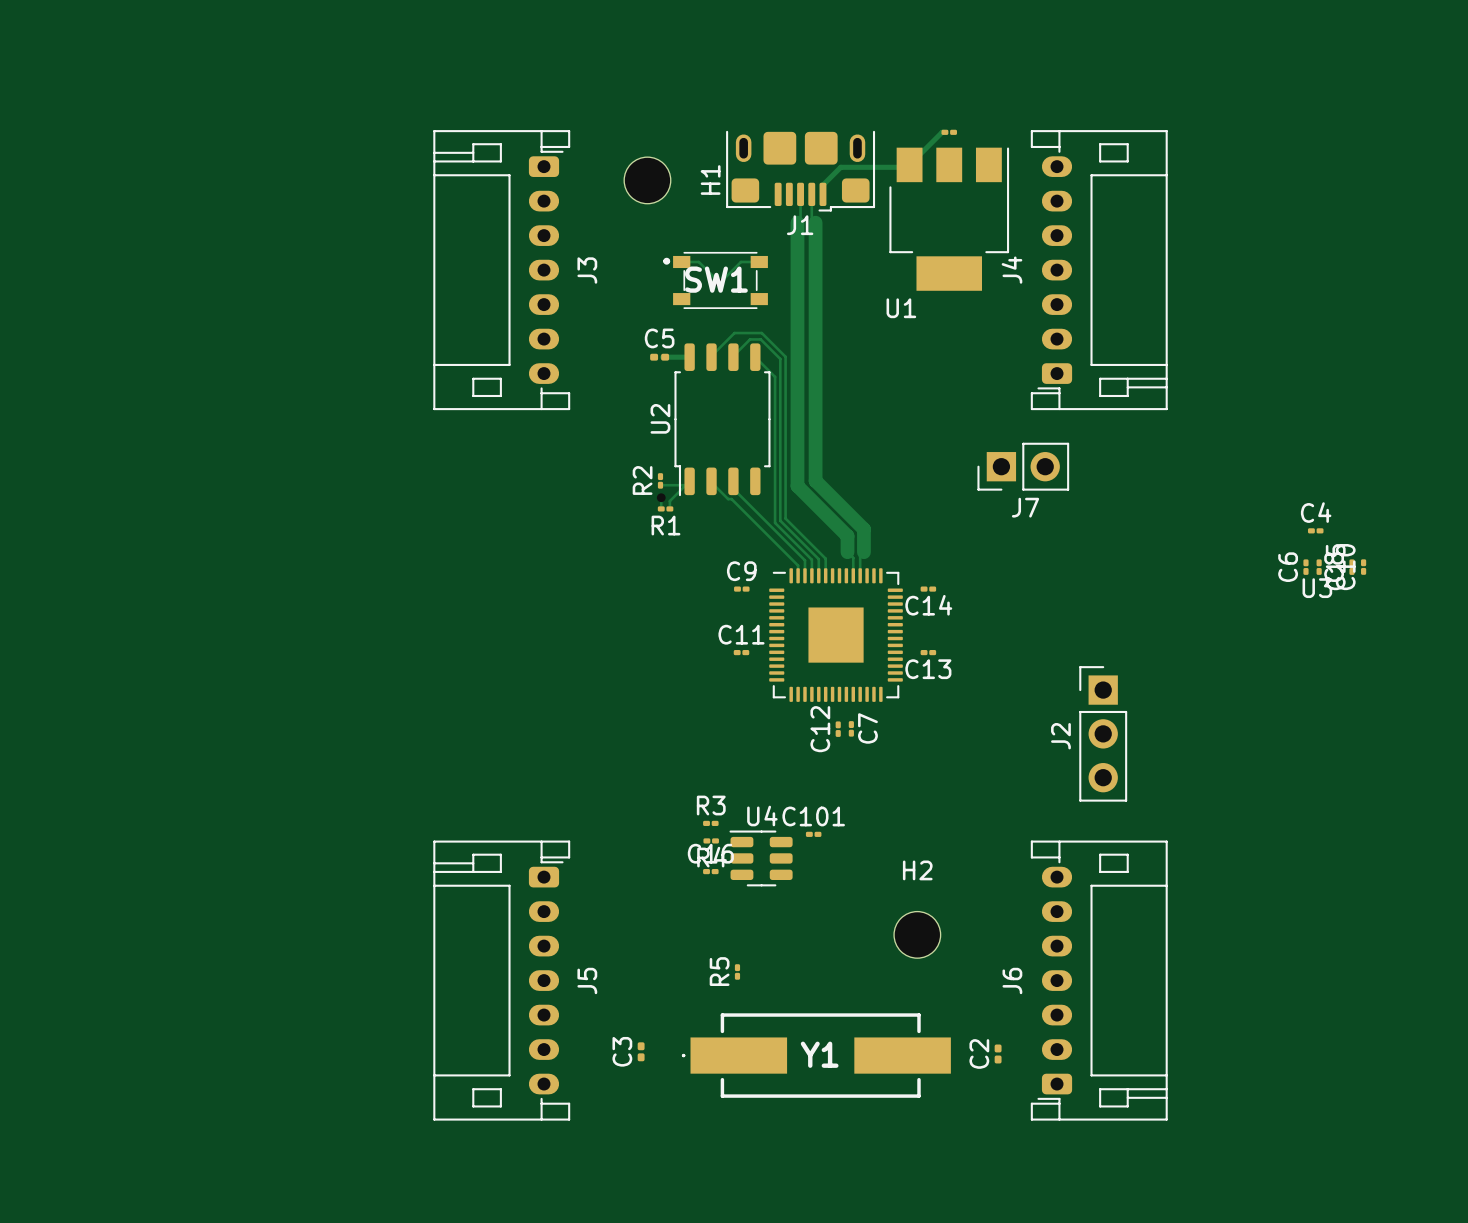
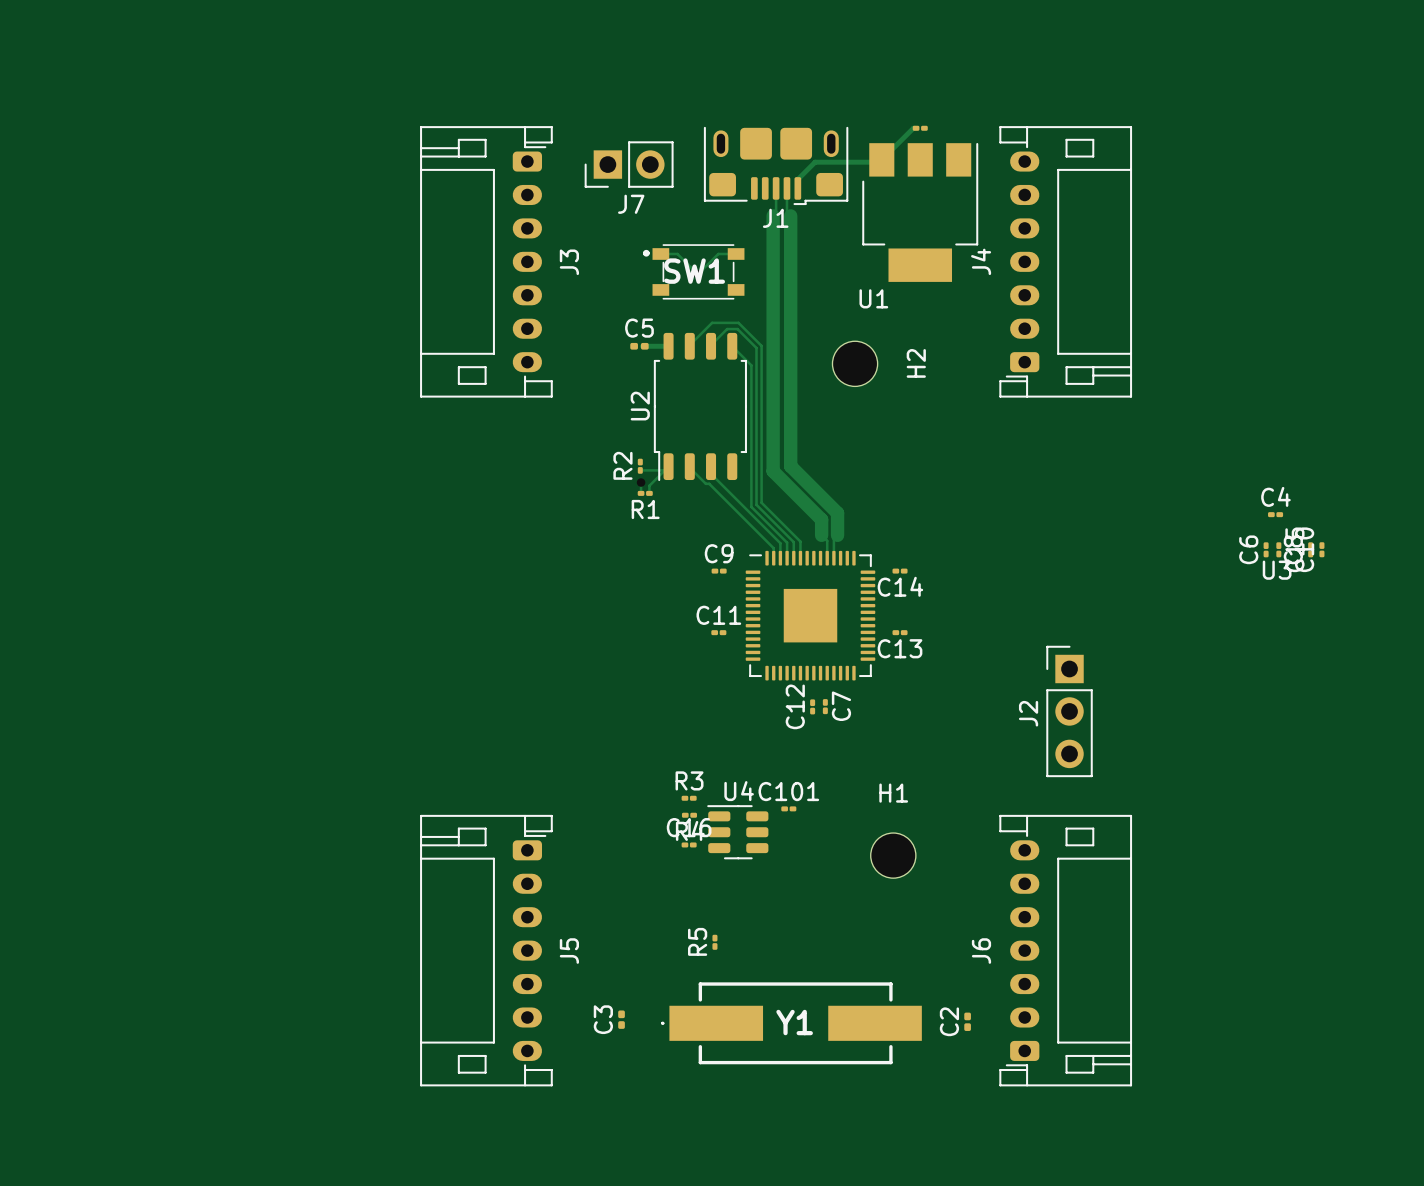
H1 position: (647, 180) -> (893, 855)
H1 name rotation: 0° (710, 180) -> 90° clockwise (893, 793)
H1 name position: H1 (710, 180) -> H1 (893, 793)
J7 position: (1023, 466) -> (629, 164)
H2 name rotation: 0° (917, 870) -> 90° counterclockwise (916, 363)
H2 name position: H2 (917, 870) -> H2 (916, 363)
H2 position: (917, 934) -> (855, 363)

